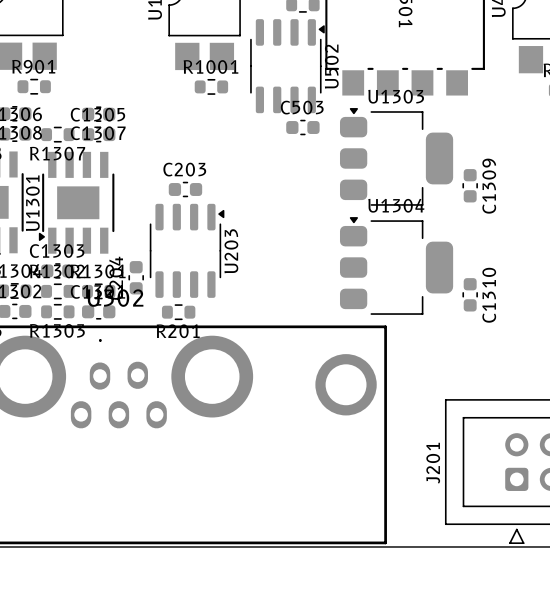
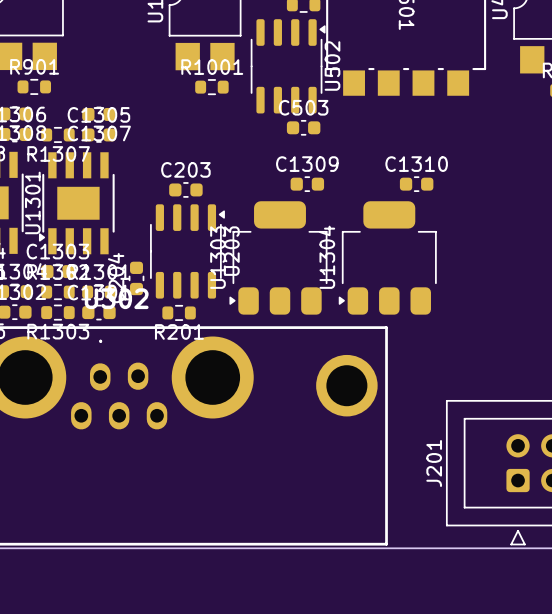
U1303 rotation: 0° (396, 156) -> 90° counterclockwise (278, 257)
U1303 position: (396, 156) -> (278, 257)
C1309 rotation: 0° (470, 185) -> 90° clockwise (307, 184)
C1309 position: (470, 185) -> (307, 184)
C1309 name position: C1309 (489, 186) -> C1309 (307, 164)
U1304 rotation: 0° (396, 265) -> 90° counterclockwise (387, 257)
C1310 rotation: 0° (470, 294) -> 90° clockwise (416, 184)
C1310 position: (470, 294) -> (416, 184)
C1310 name position: C1310 (489, 295) -> C1310 (416, 164)

